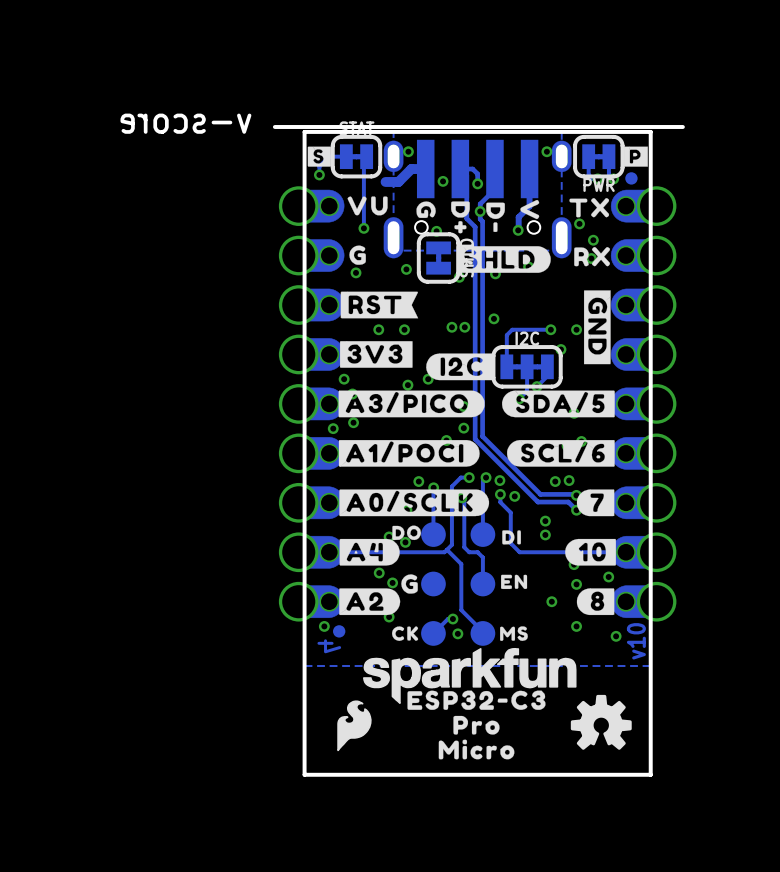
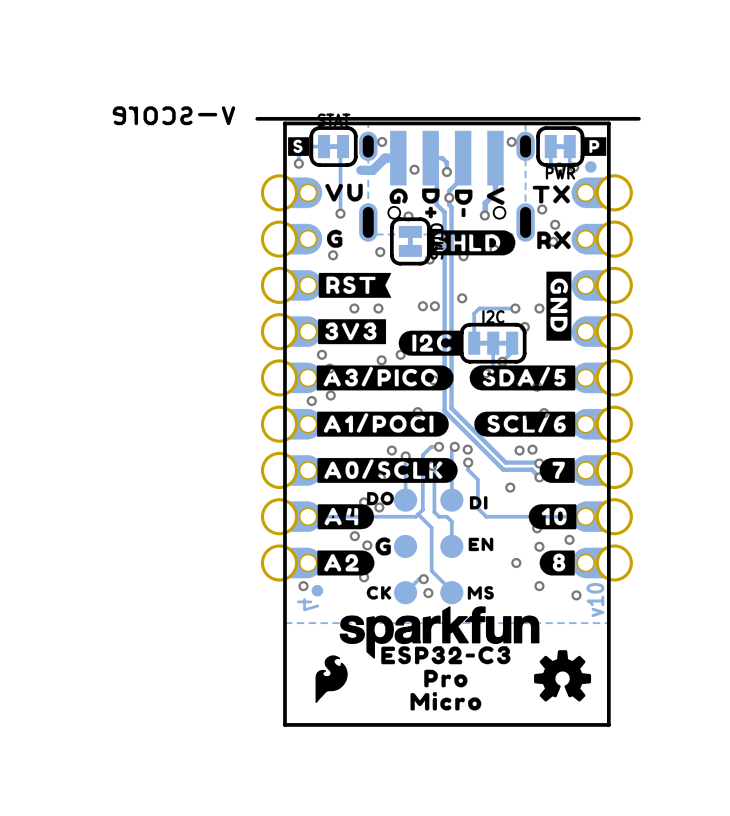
via: (463, 428) -> none
via: (514, 496) -> none
via: (545, 534) -> none

